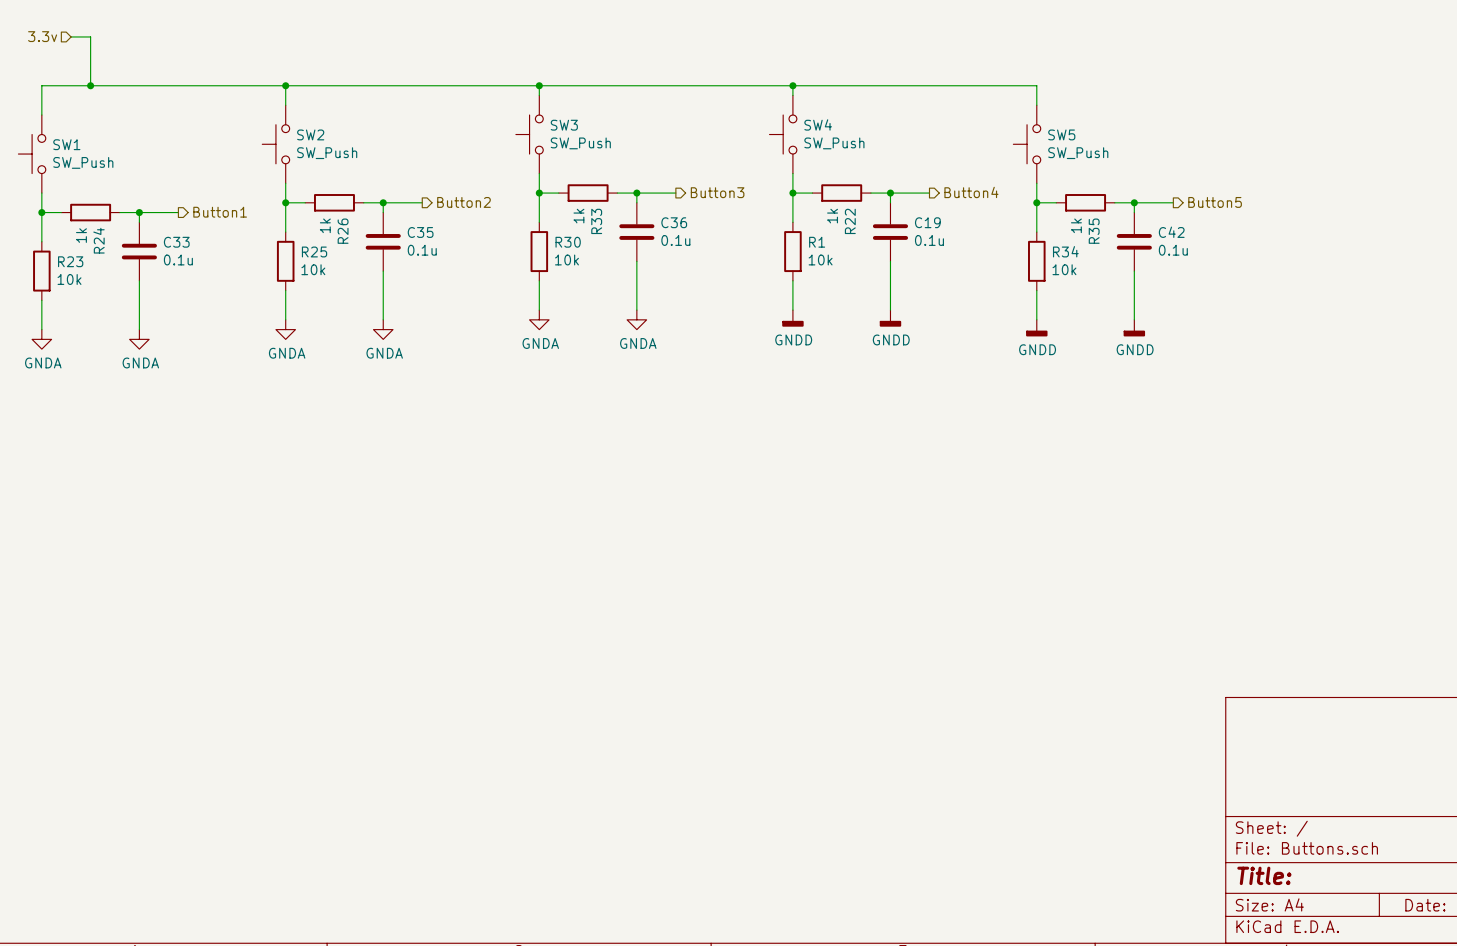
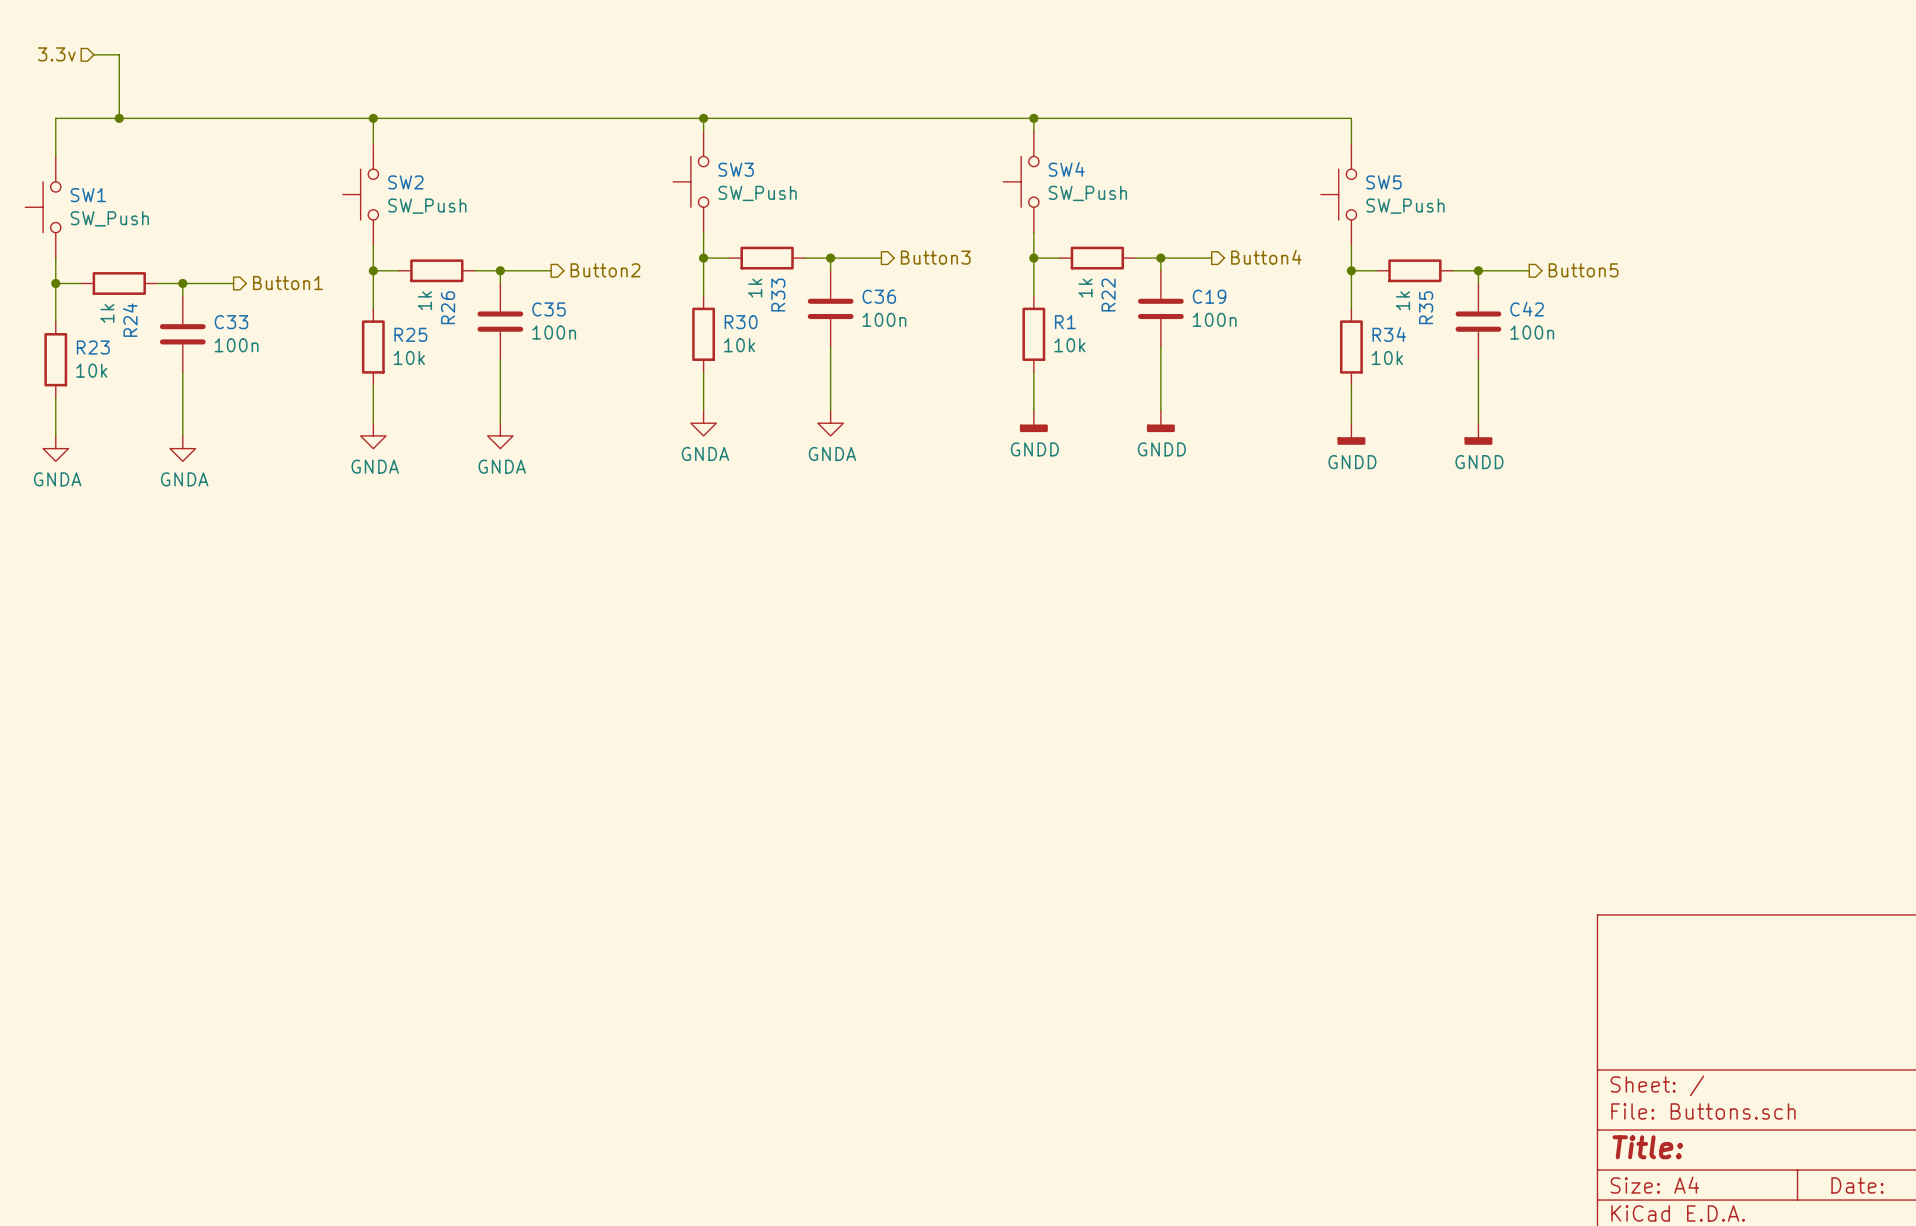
C36 value: 0.1u (675, 240) -> 100n (884, 319)
C19 value: 0.1u (929, 240) -> 100n (1214, 319)
C35 value: 0.1u (422, 250) -> 100n (554, 332)
C42 value: 0.1u (1173, 250) -> 100n (1532, 332)
C33 value: 0.1u (178, 259) -> 100n (236, 345)

